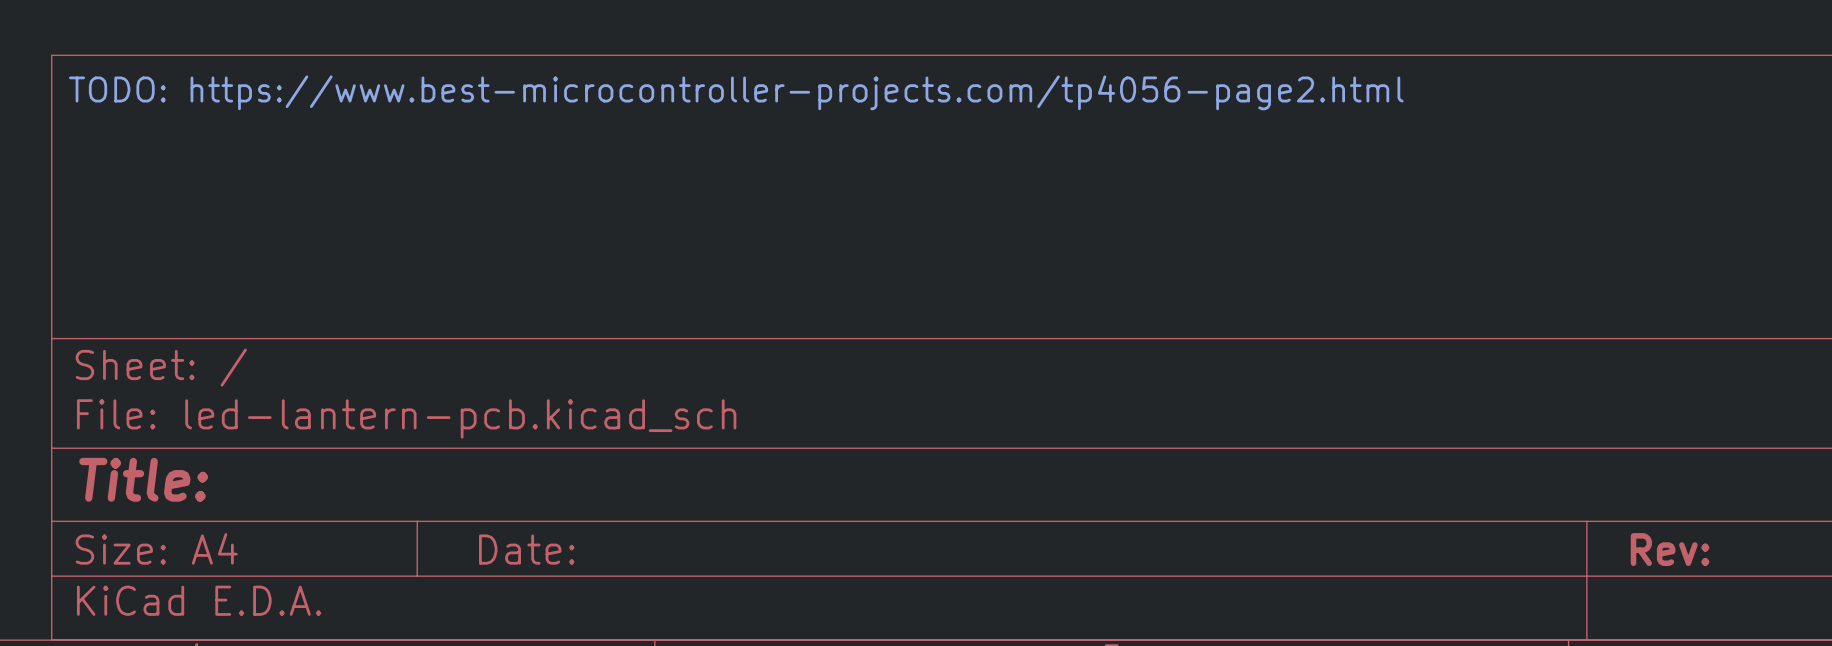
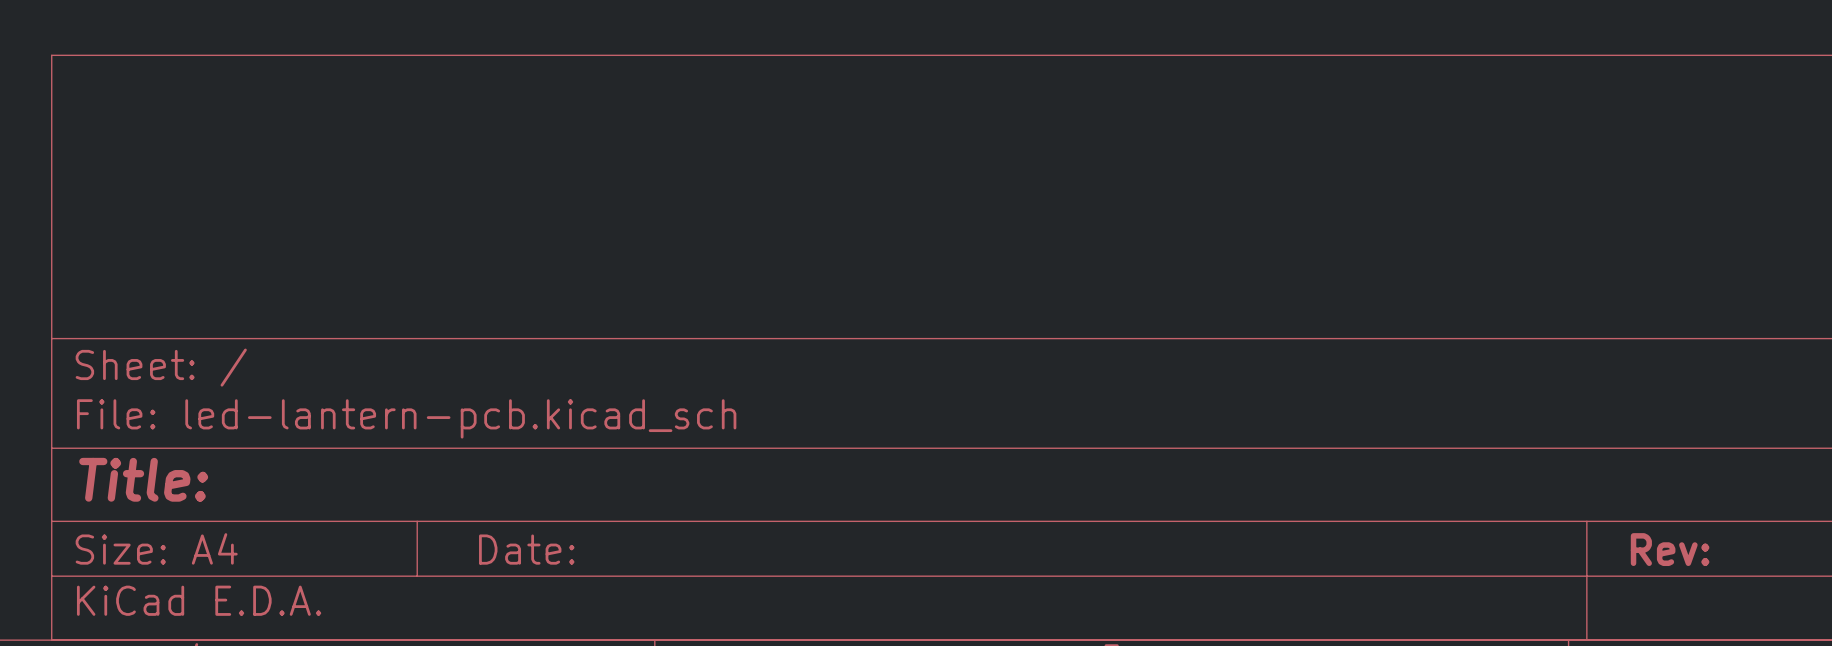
text: TODO: https://www.best-microcontroller-projects.com/tp4056-page2.html (736, 92) -> none

